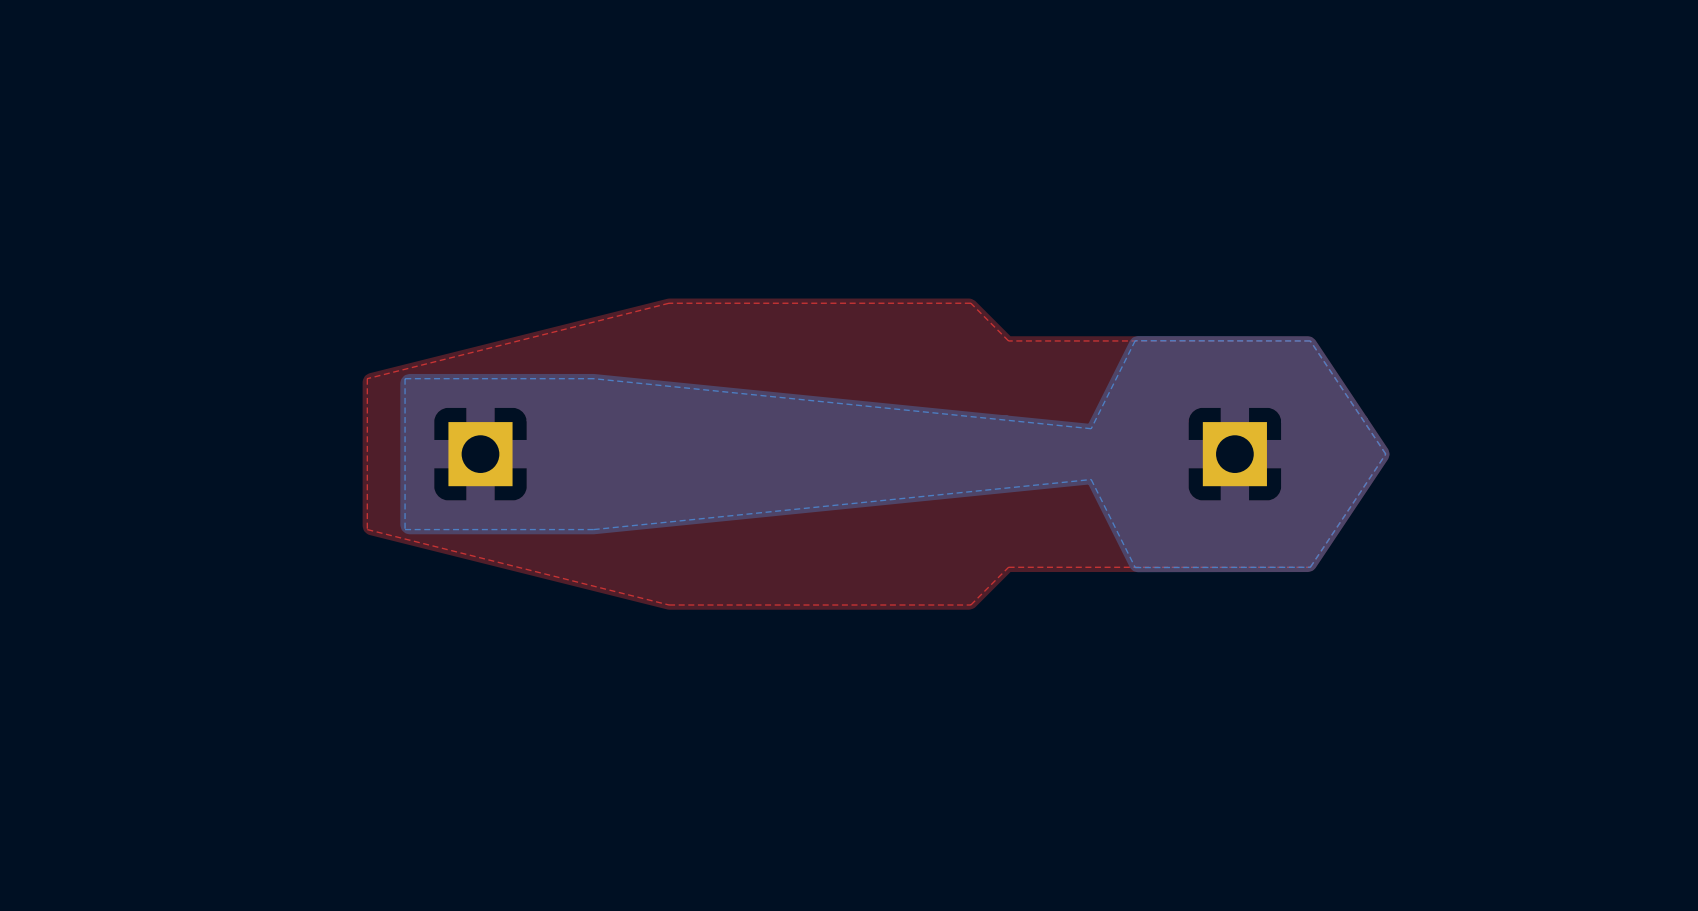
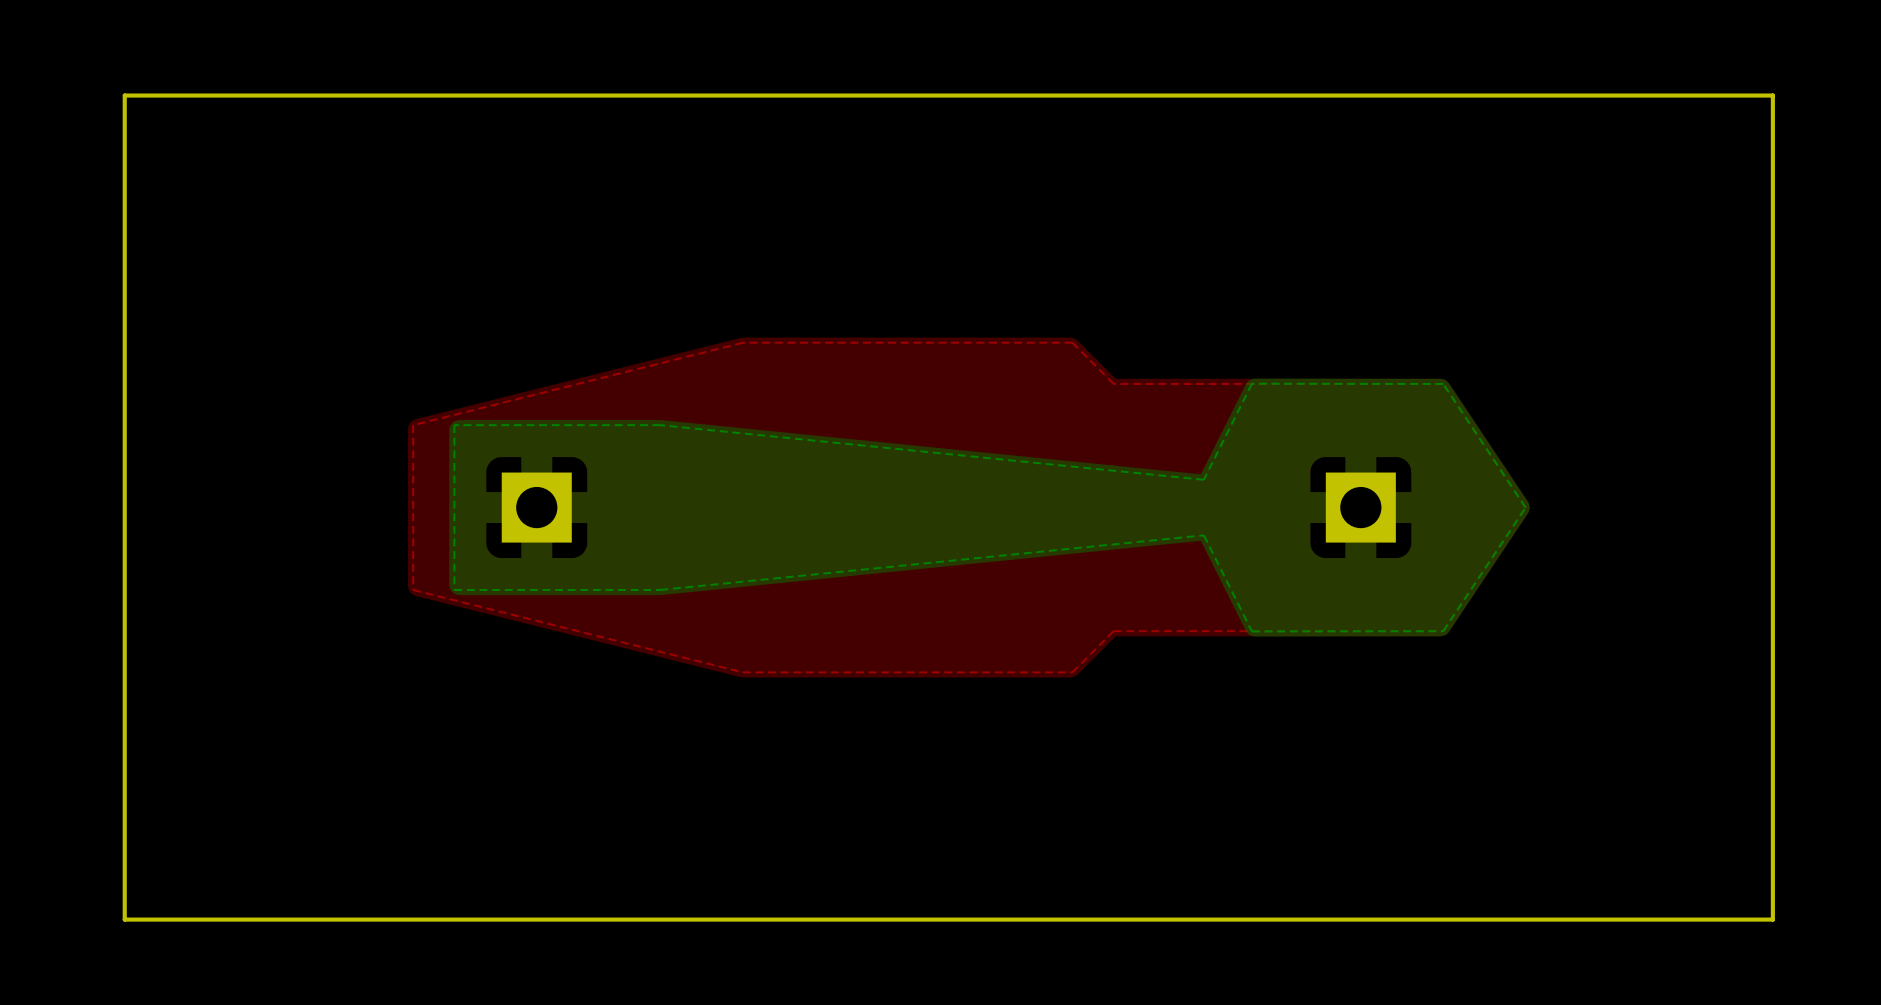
board edge: none -> (1772, 95) (124, 95) (124, 919) (1772, 919) (1772, 95)

